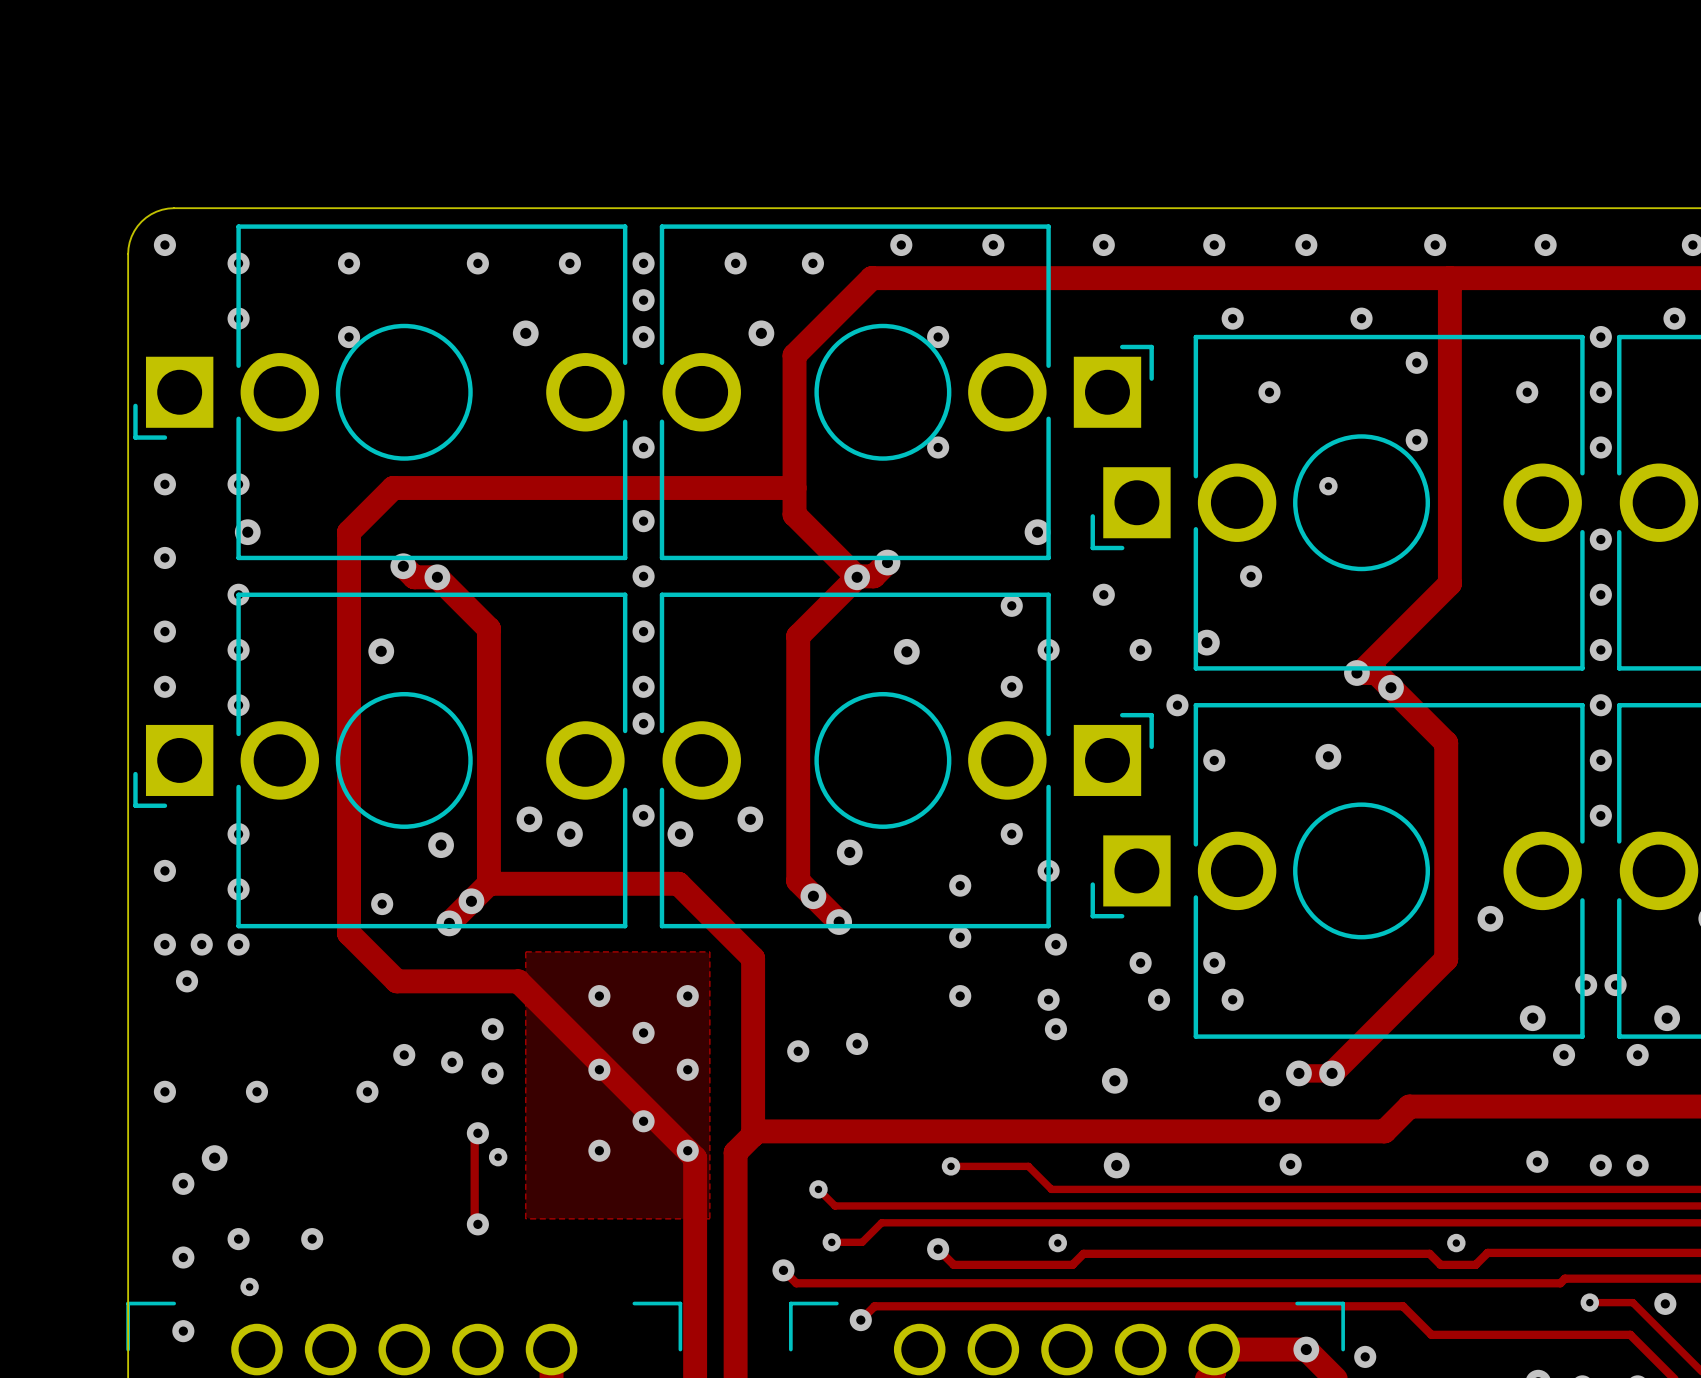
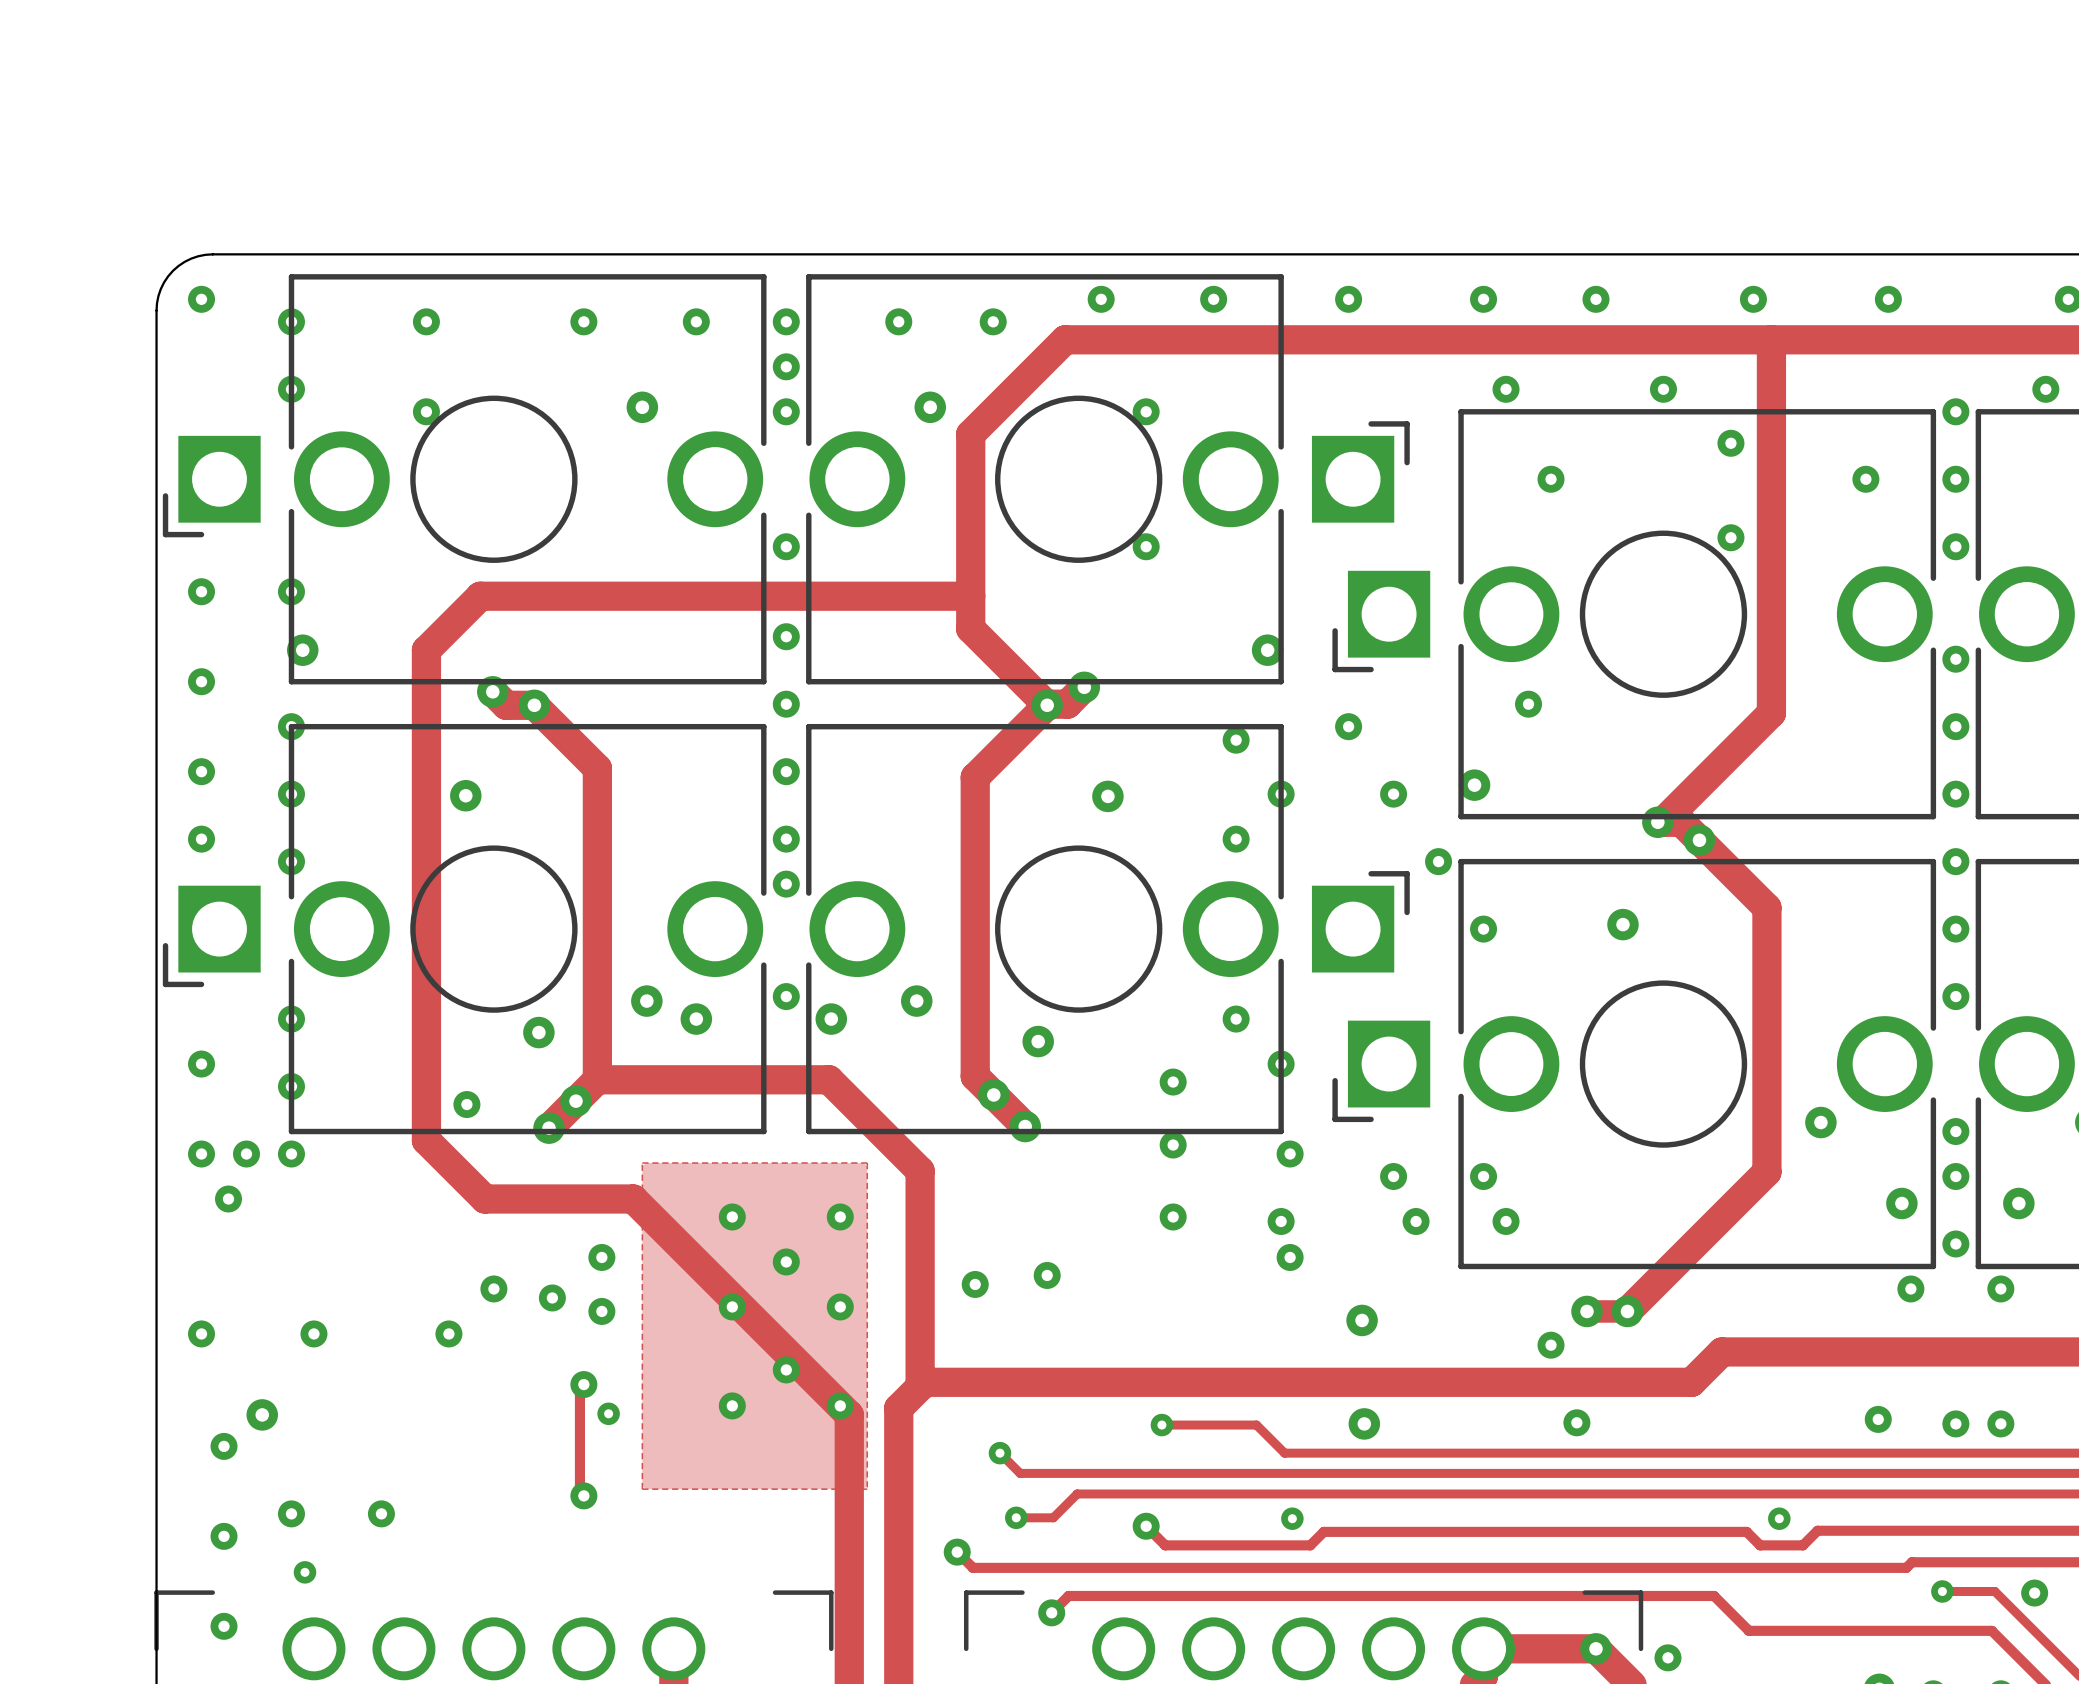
via: (1328, 486) -> none
via: none -> (1955, 1131)
via: none -> (1955, 1176)
via: (1586, 985) -> none
via: (1615, 985) -> none
via position: (1532, 1018) -> (1901, 1203)
via: none -> (1955, 1243)
via position: (1667, 1018) -> (2018, 1203)

